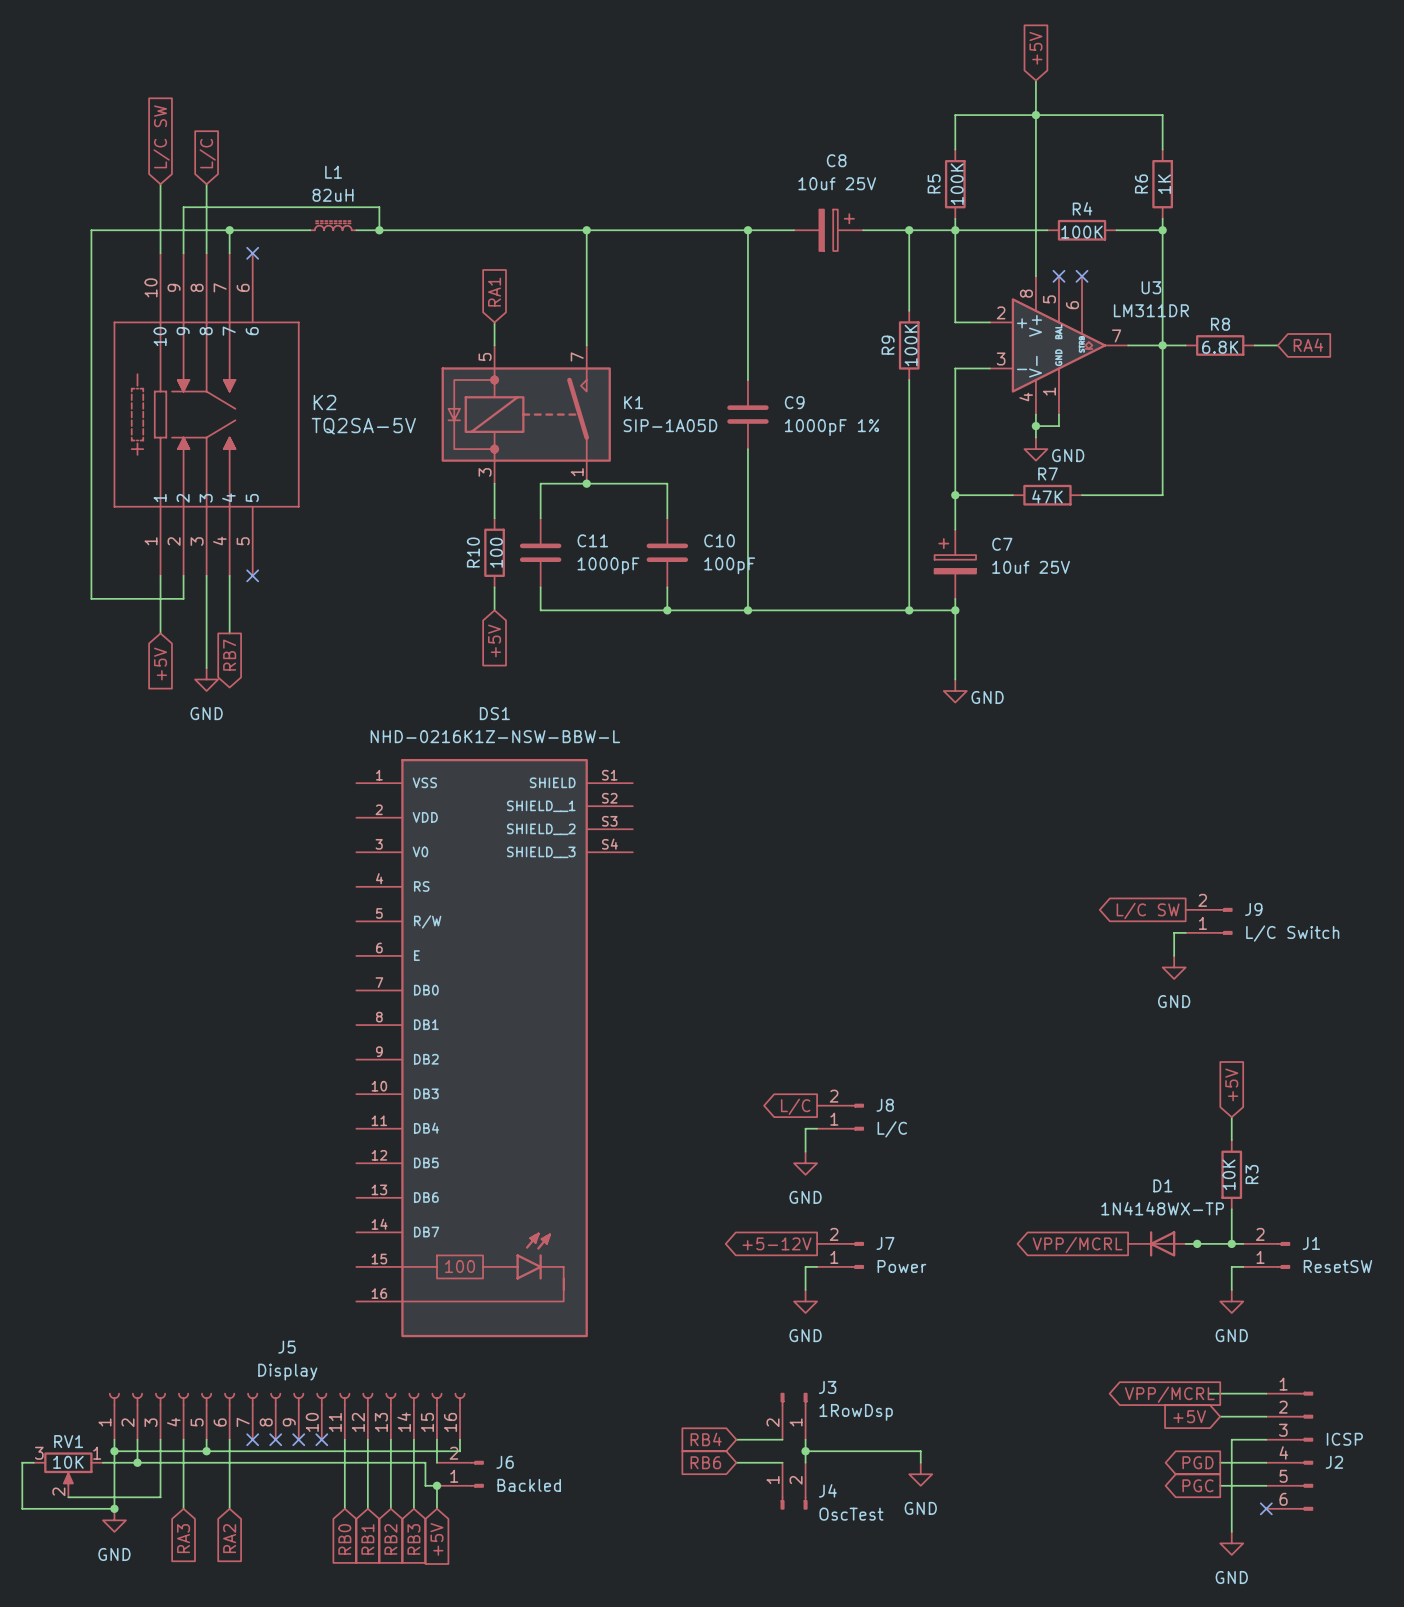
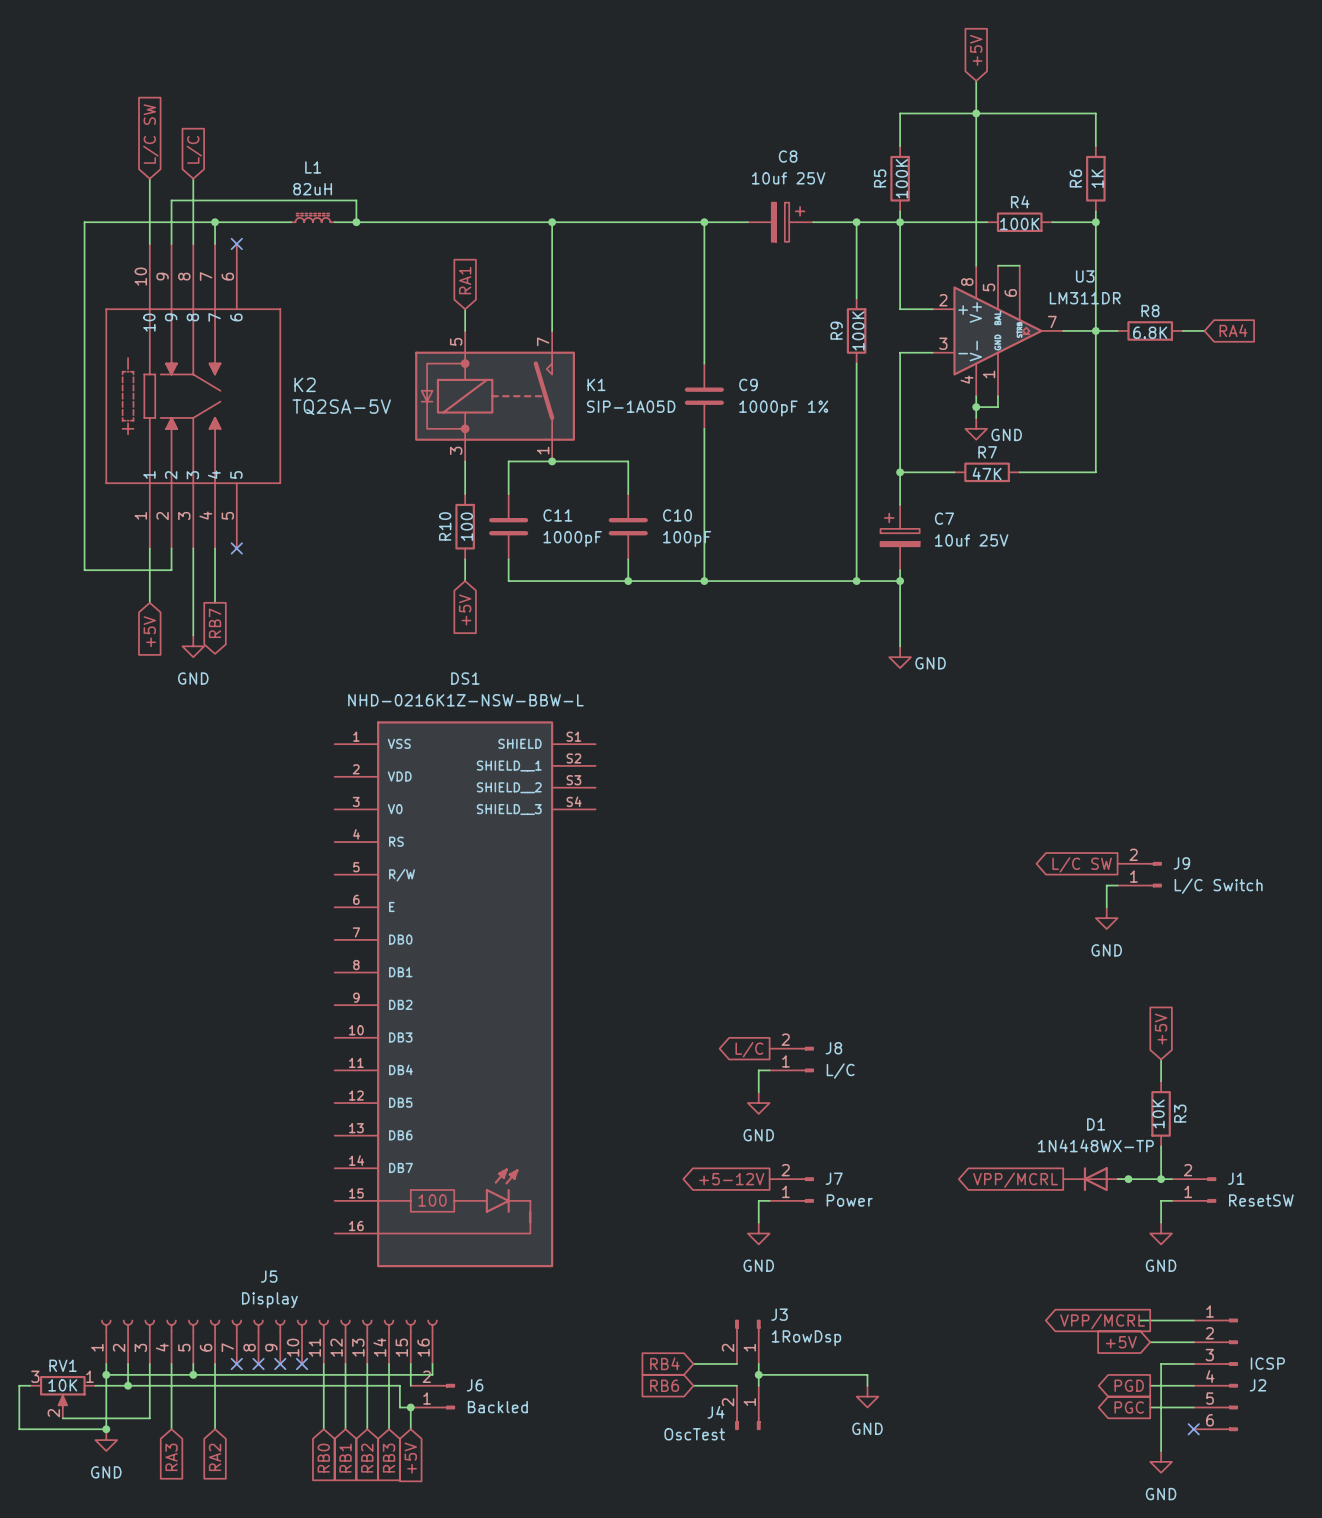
wire: none -> (997, 265) (1019, 265)
no-connect mark: (1058, 276) -> none
no-connect mark: (1082, 276) -> none
J4 flip: as is (794, 1503) -> left-right (747, 1423)

